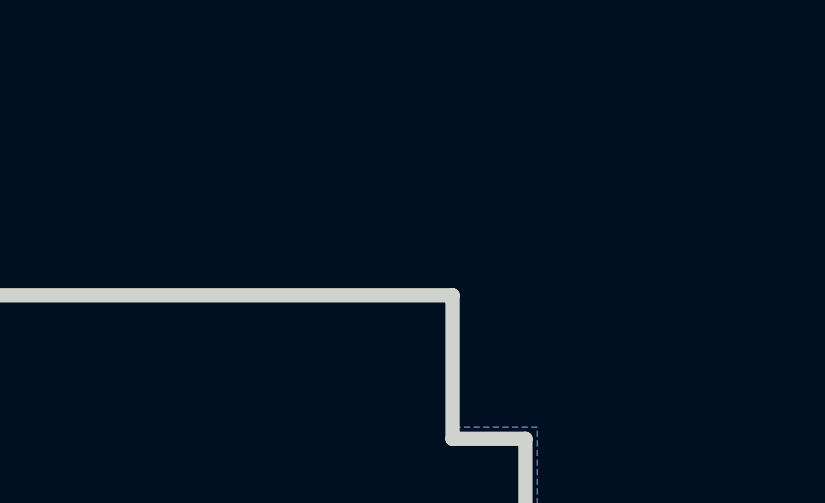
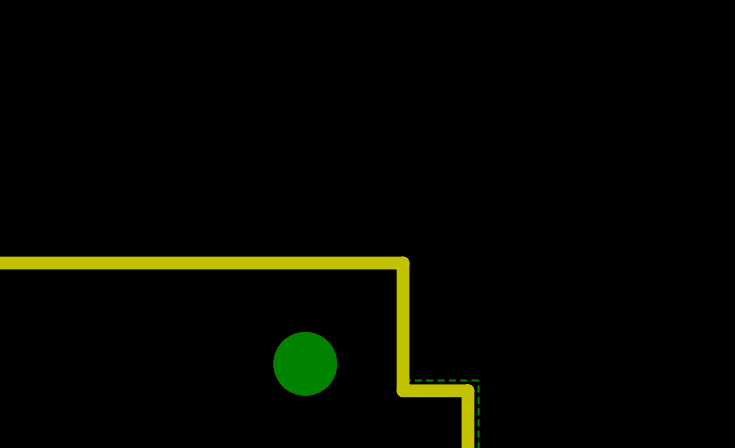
part: none -> (305, 363)

